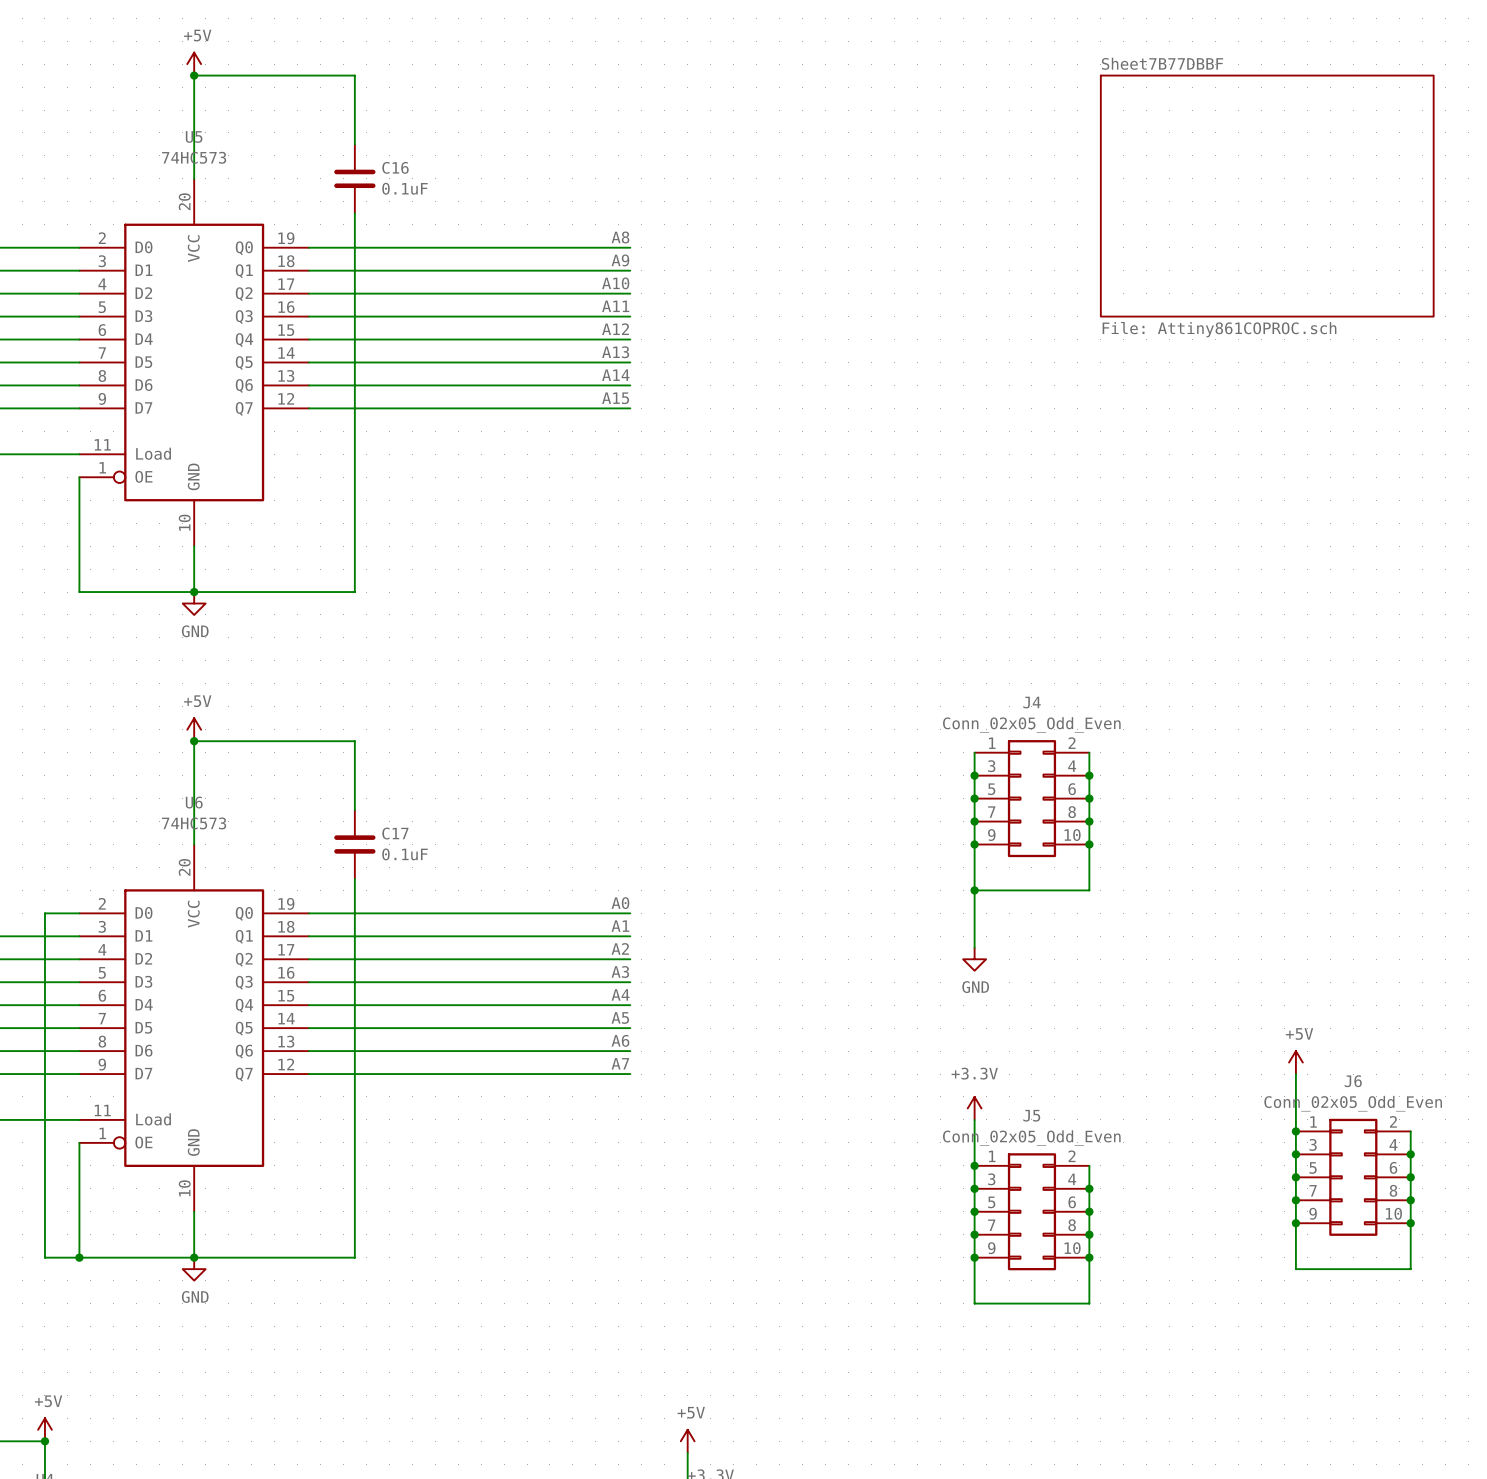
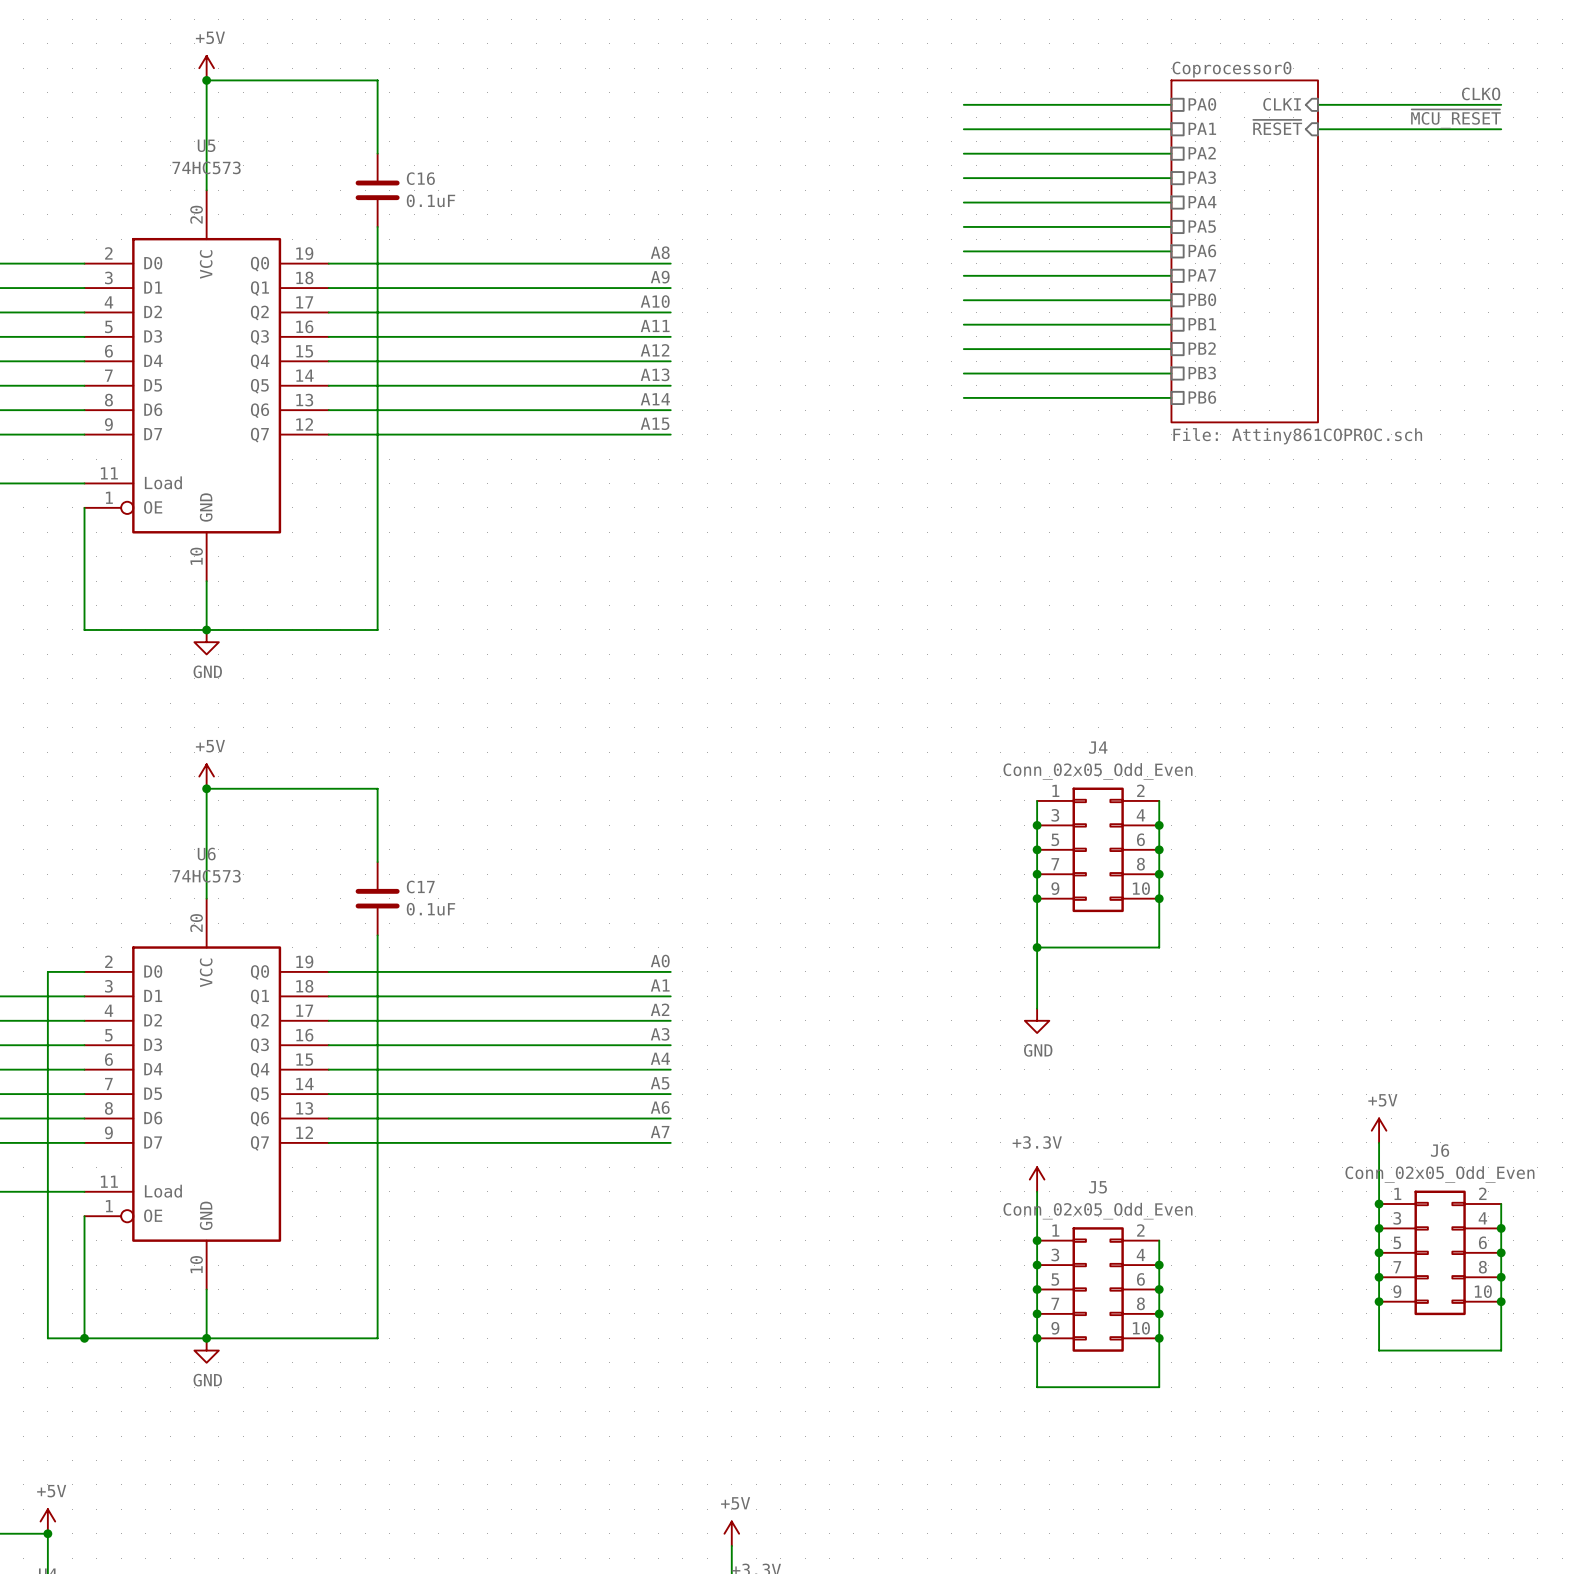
label: none -> CLKO (1481, 93)
wire: none -> (963, 104) (1171, 104)
sheet pin: none -> PA0 (1202, 104)
sheet pin: none -> CLKI (1282, 104)
wire: none -> (1318, 104) (1501, 104)
label: none -> ~{MCU_RESET} (1455, 118)
sheet pin: none -> ~{RESET} (1277, 127)
wire: none -> (963, 129) (1171, 129)
sheet pin: none -> PA1 (1202, 128)
wire: none -> (1318, 129) (1501, 129)
sheet pin: none -> PA2 (1202, 153)
wire: none -> (963, 153) (1171, 153)
sheet pin: none -> PA3 (1202, 177)
wire: none -> (963, 178) (1171, 178)
sheet pin: none -> PA4 (1202, 202)
wire: none -> (963, 202) (1171, 202)
sheet Sheet7B77DBBF: File: Attiny861COPROC.sch (1267, 196) -> none
sheet pin: none -> PA5 (1202, 226)
wire: none -> (963, 226) (1171, 226)
sheet pin: none -> PA6 (1202, 250)
wire: none -> (963, 251) (1171, 251)
sheet Coprocessor0: none -> File: Attiny861COPROC.sch (1244, 251)
sheet pin: none -> PA7 (1202, 275)
wire: none -> (963, 275) (1171, 275)
sheet pin: none -> PB0 (1202, 299)
wire: none -> (963, 300) (1171, 300)
sheet pin: none -> PB1 (1202, 324)
wire: none -> (963, 324) (1171, 324)
sheet pin: none -> PB2 (1202, 348)
wire: none -> (963, 349) (1171, 349)
sheet pin: none -> PB3 (1202, 373)
wire: none -> (963, 373) (1171, 373)
wire: none -> (963, 397) (1171, 397)
sheet pin: none -> PB6 (1202, 397)

